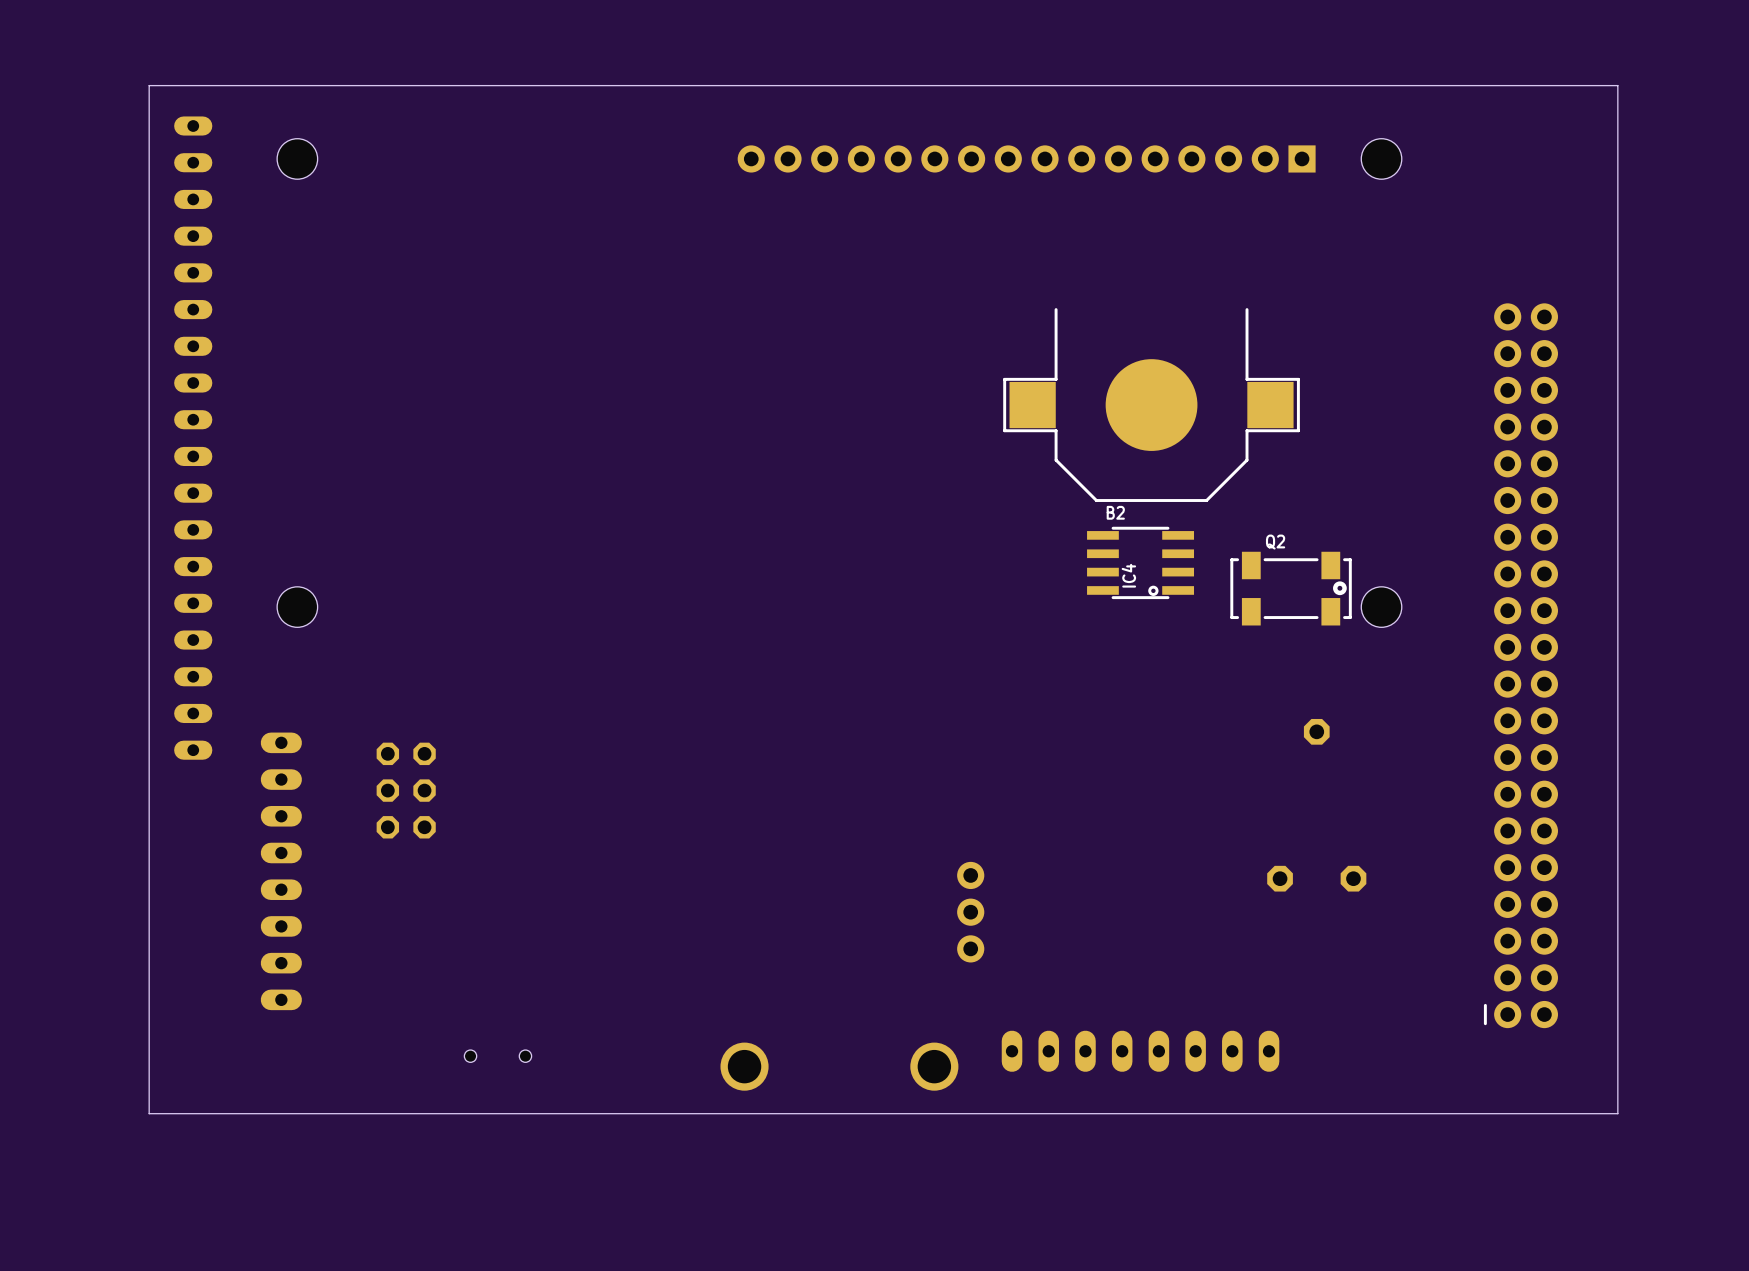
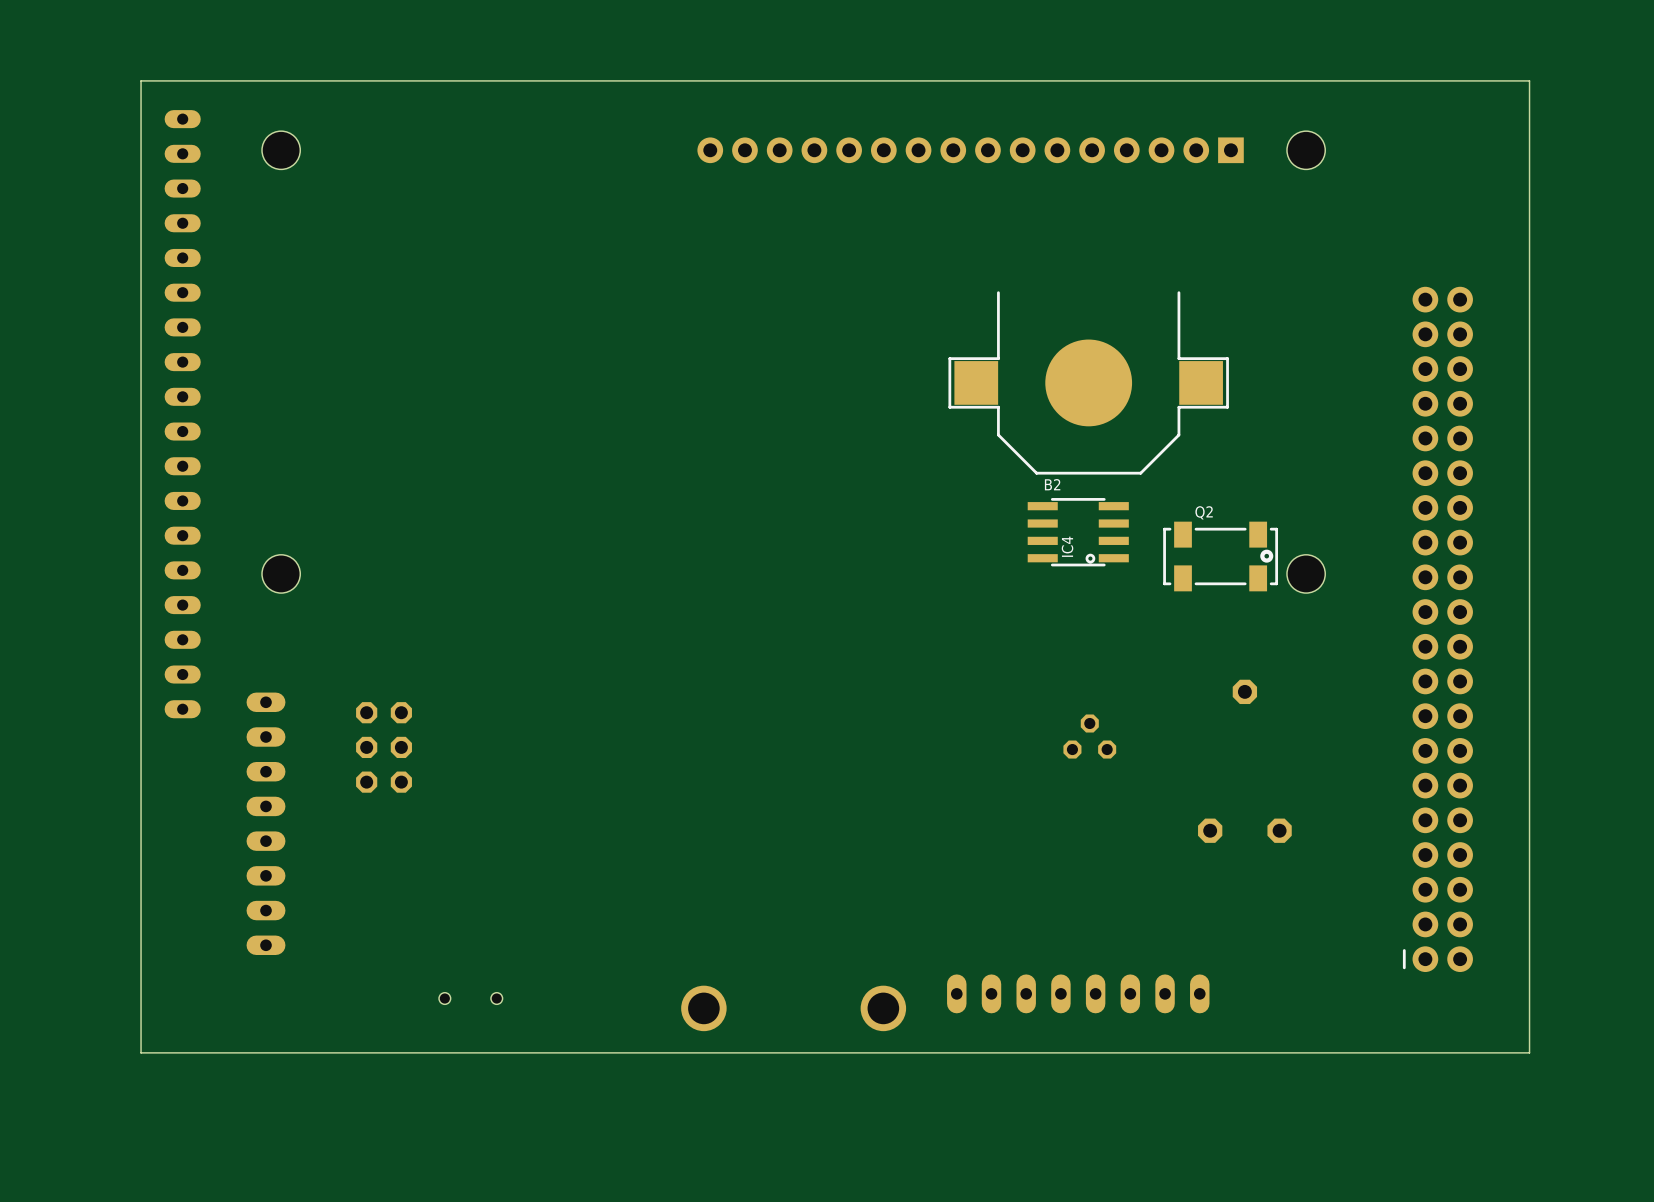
part: none -> (1089, 736)
part: (970, 912) -> none

